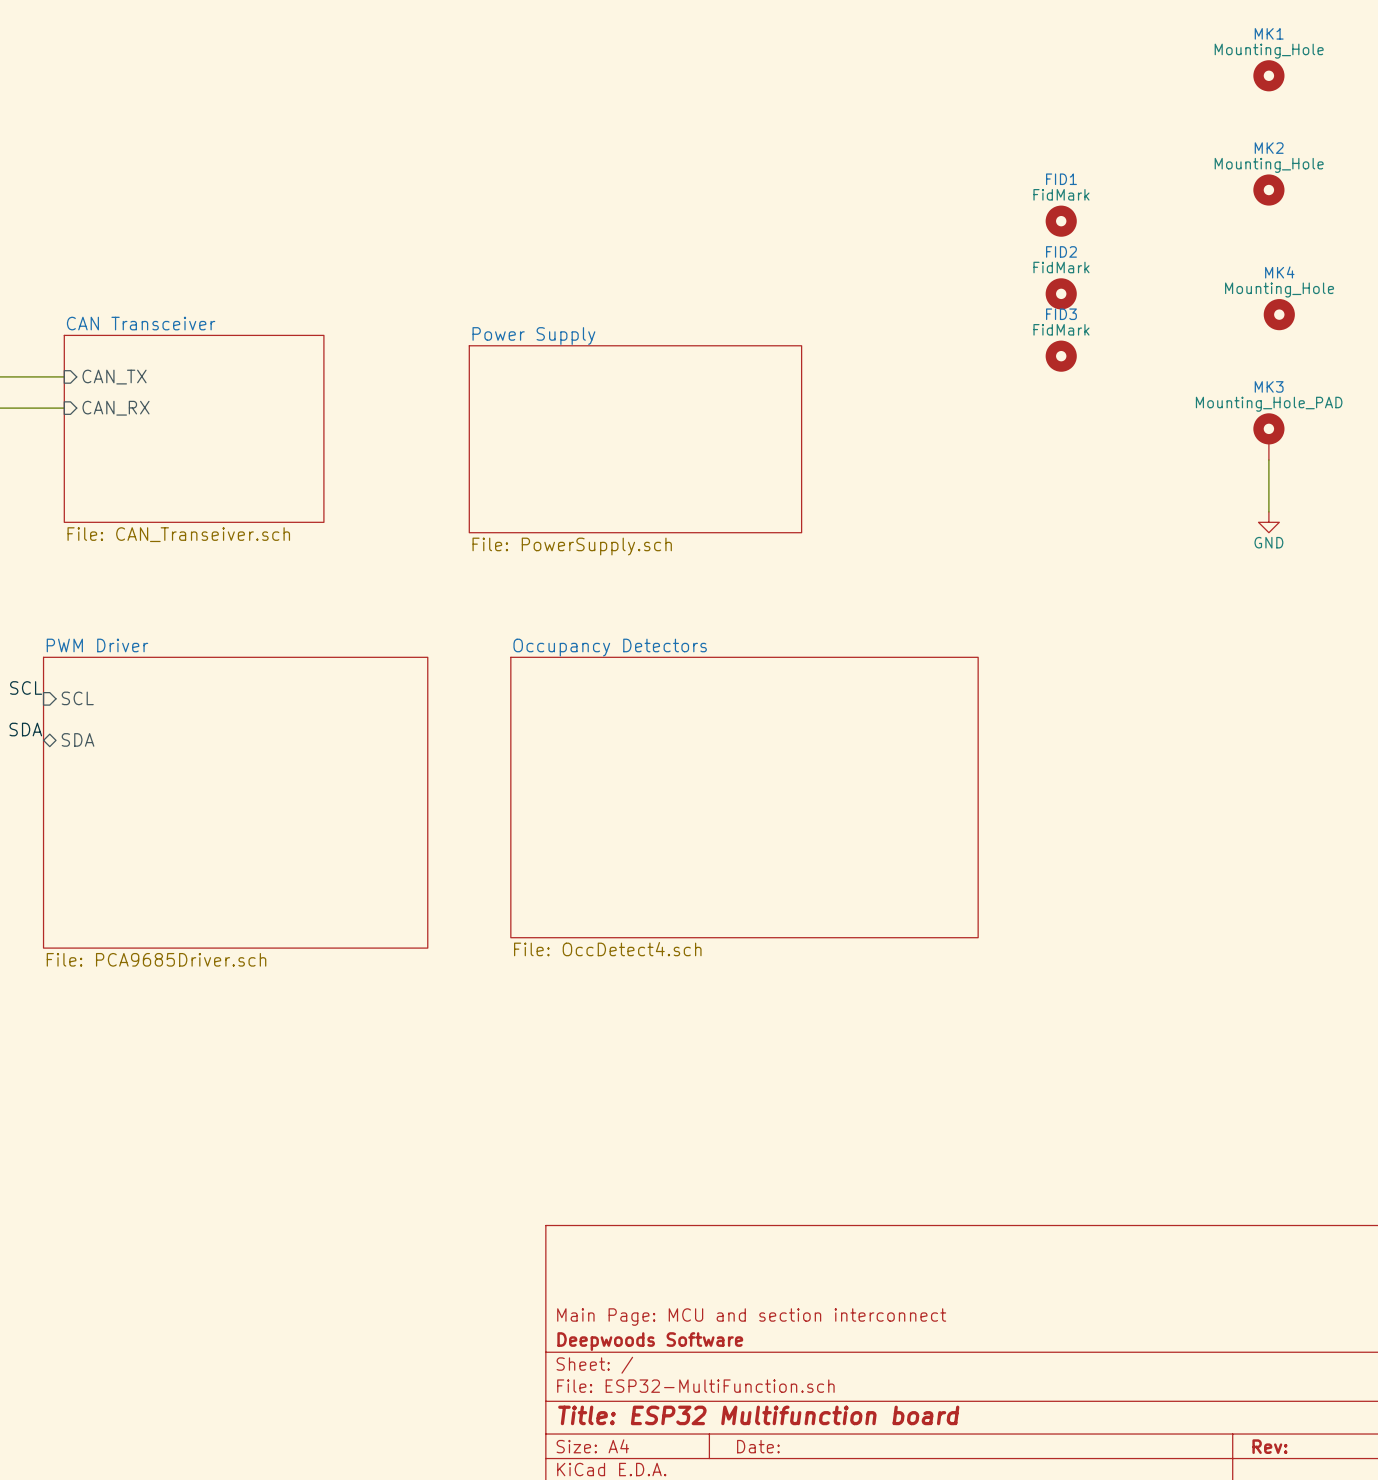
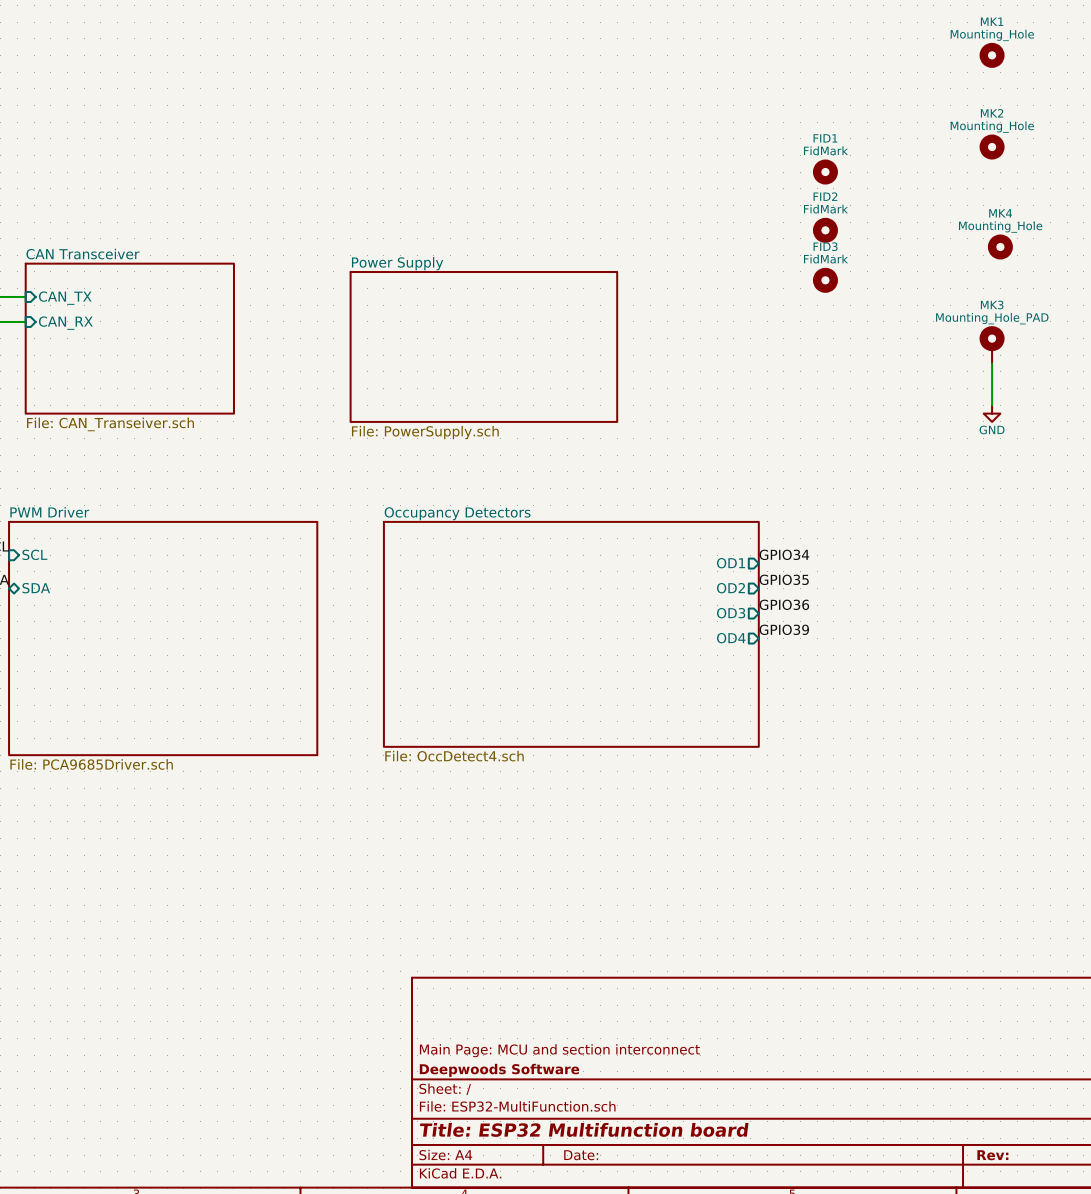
label: none -> GPIO34 (784, 554)
sheet pin: none -> OD1 (731, 563)
label: none -> GPIO35 (784, 579)
sheet pin: none -> OD2 (730, 588)
label: none -> GPIO36 (784, 604)
sheet pin: none -> OD3 (731, 613)
label: none -> GPIO39 (784, 629)
sheet pin: none -> OD4 (731, 638)

